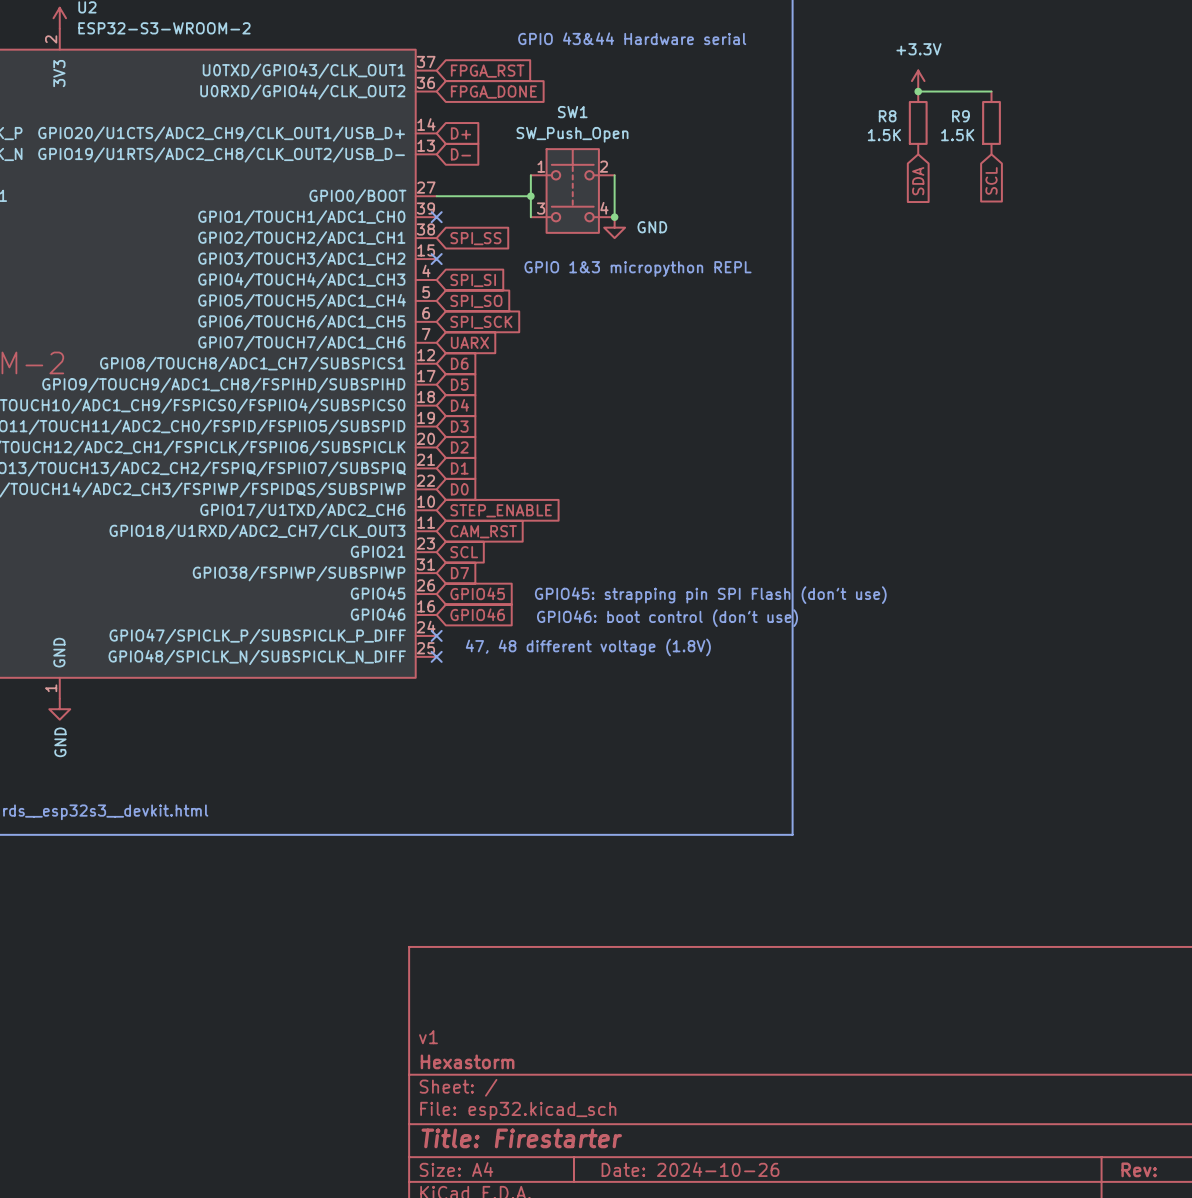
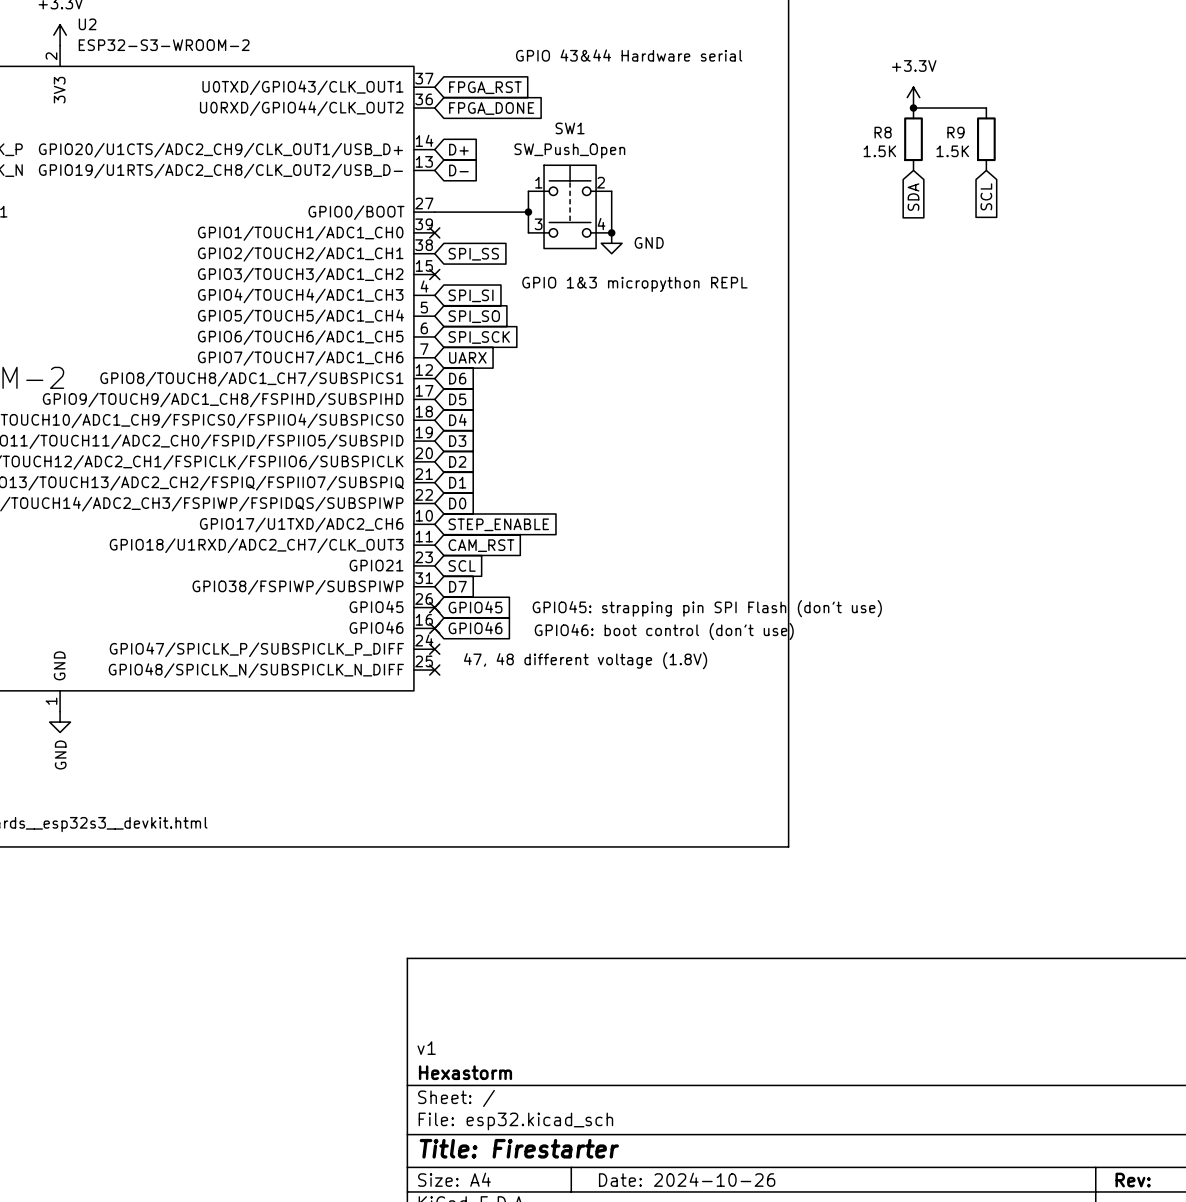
no-connect mark: none -> (434, 607)
no-connect mark: none -> (434, 628)

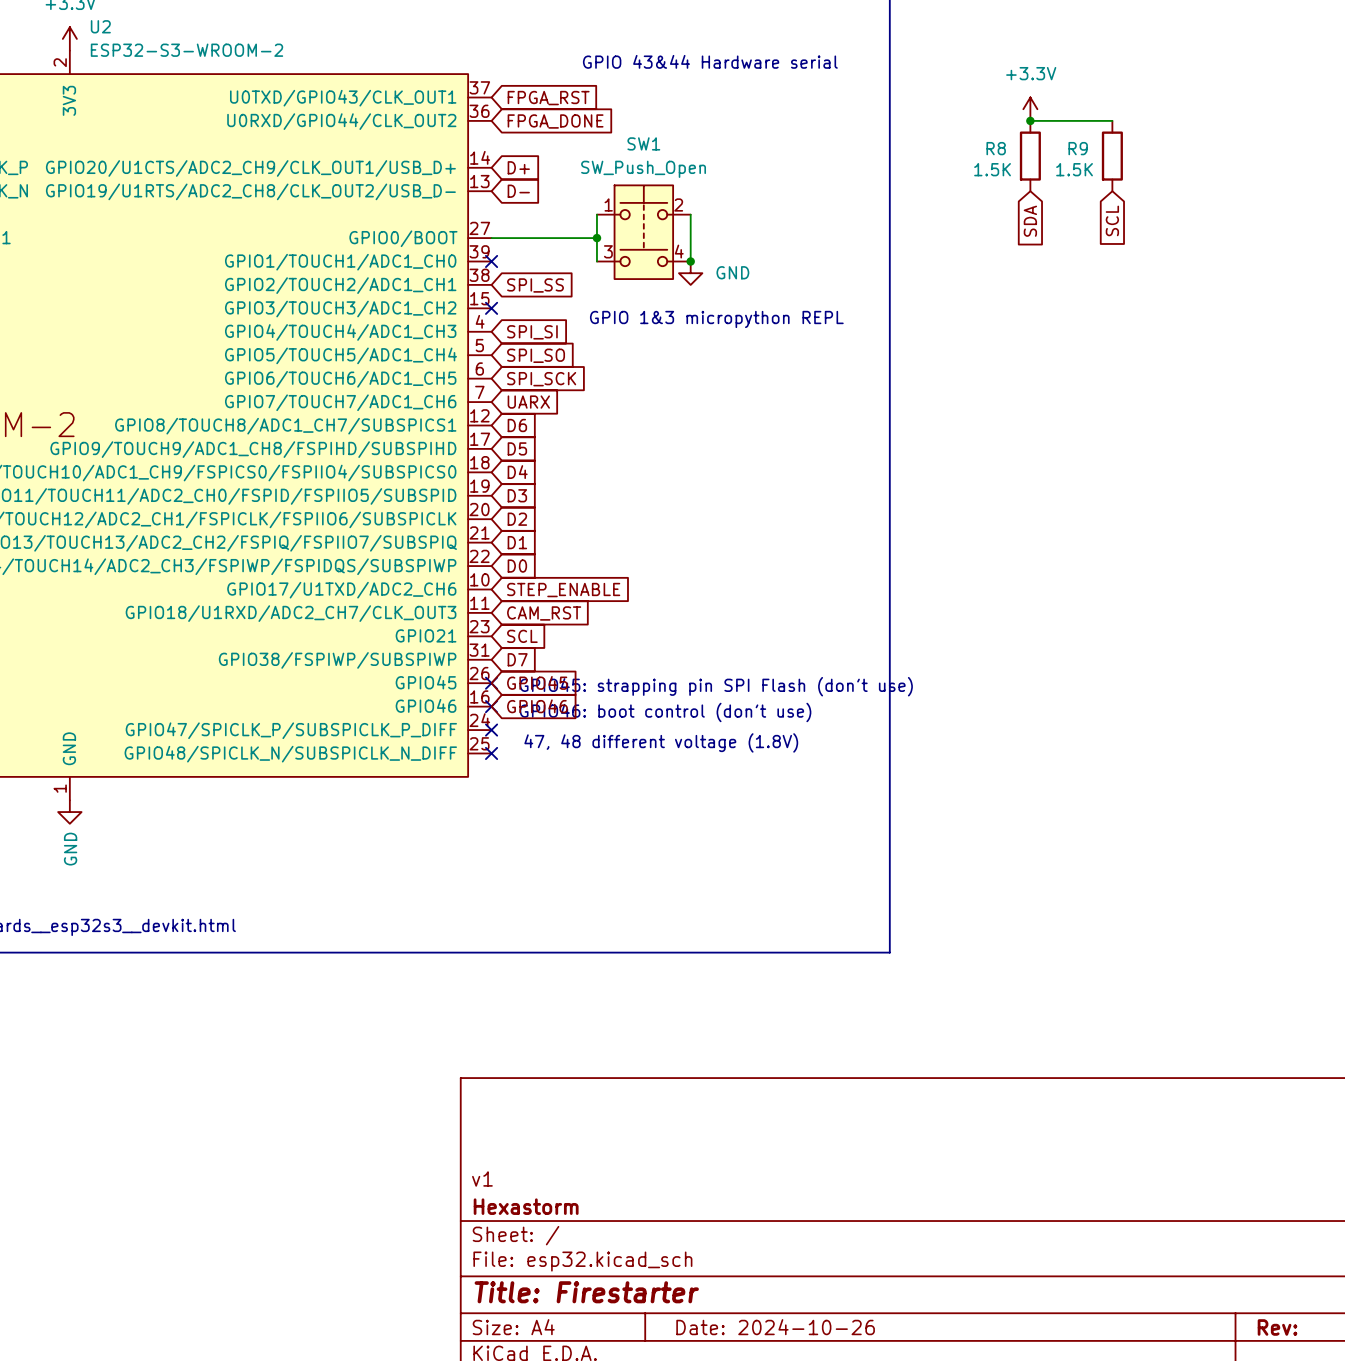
text position: GPIO45: strapping pin SPI Flash (don't use) (707, 608) -> GPIO45: strapping pin SPI Flash (don't use) (716, 686)
text position: GPIO46: boot control (don't use) (664, 631) -> GPIO46: boot control (don't use) (665, 712)

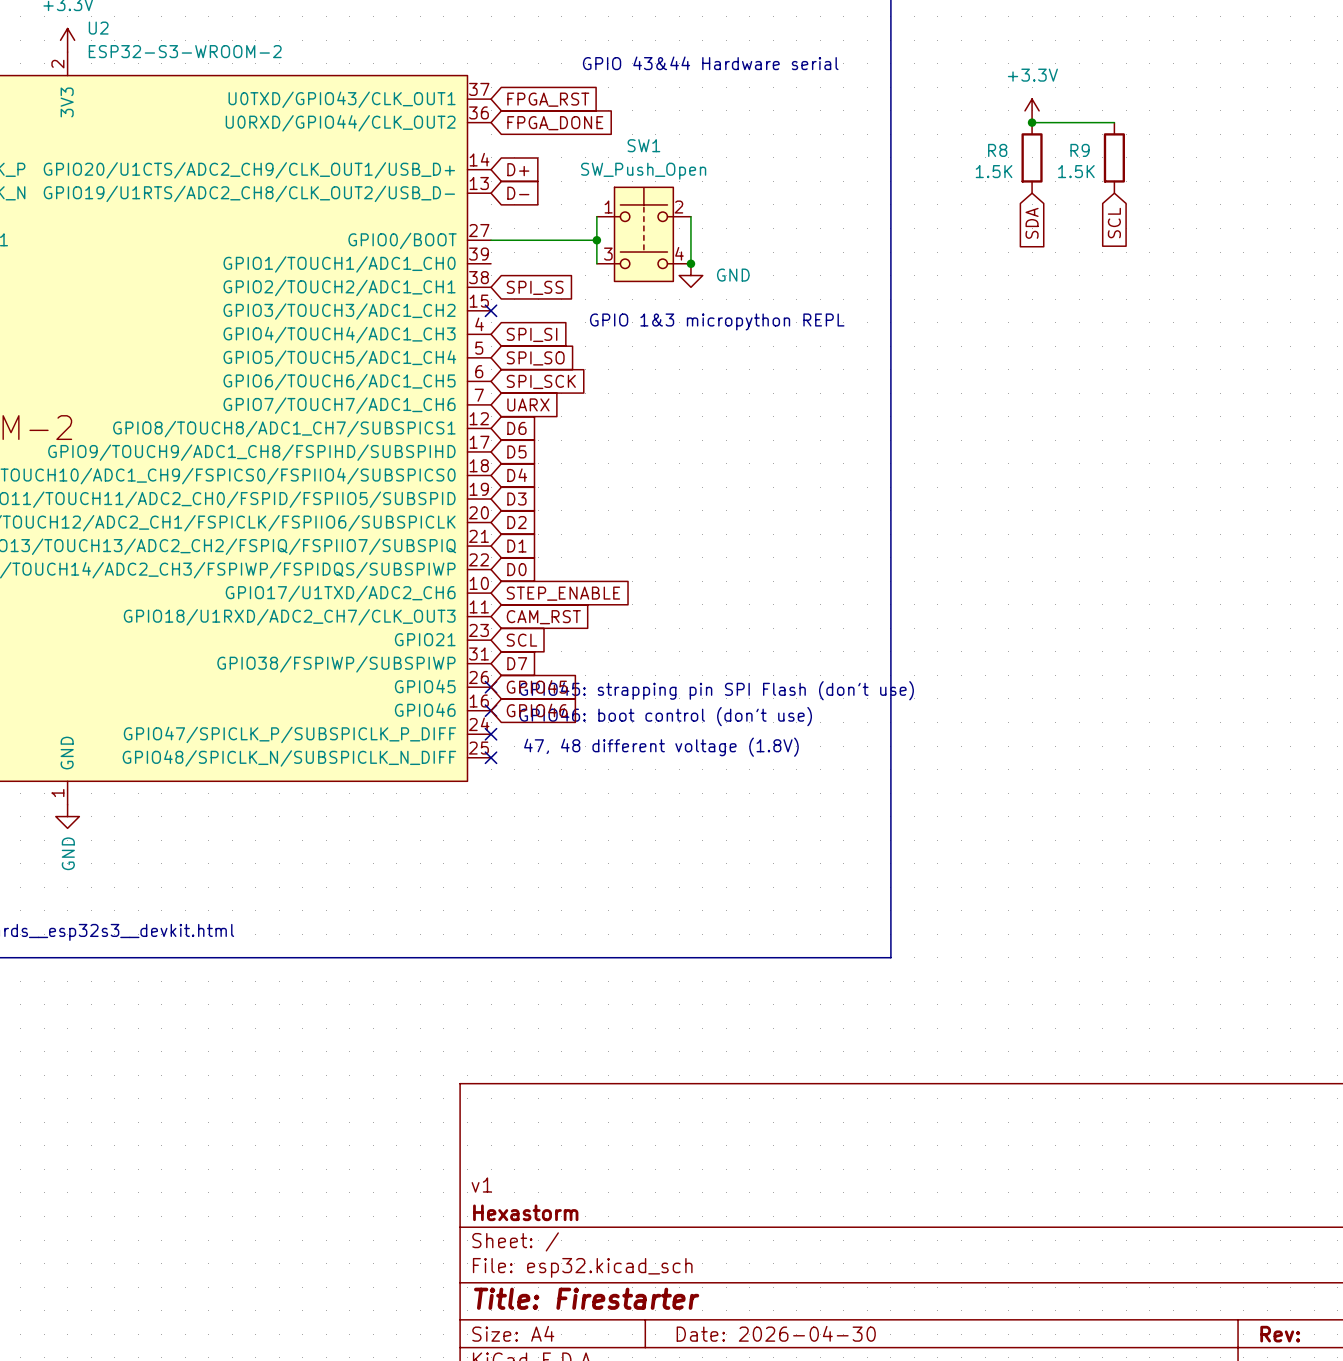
no-connect mark: (491, 261) -> none
title block: Date: 2024-10-26 (775, 1327) -> Date: 2026-04-30 (776, 1333)

